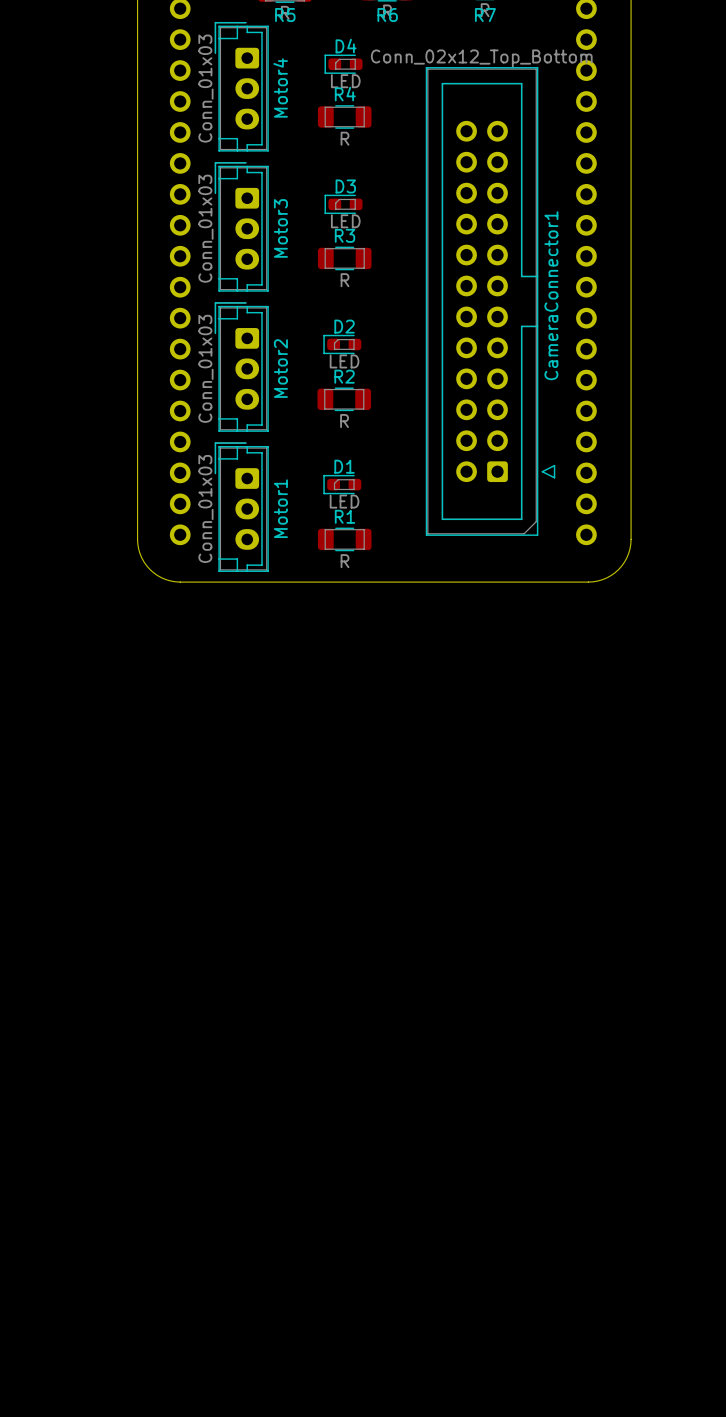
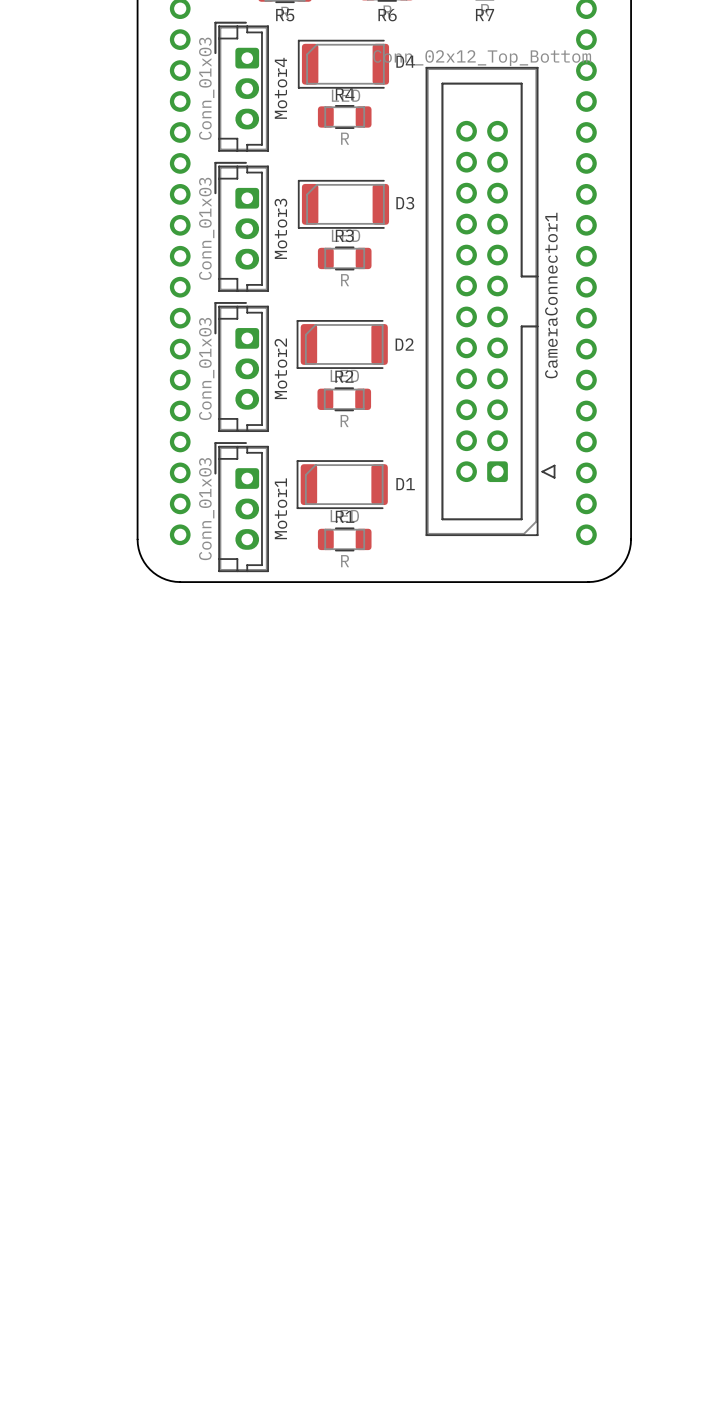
D4 name position: D4 (346, 46) -> D4 (405, 61)
D4 footprint: [324, 54, 363, 74] -> [298, 39, 390, 89]
D3 name position: D3 (345, 186) -> D3 (405, 203)
D3 footprint: [324, 194, 363, 215] -> [298, 180, 390, 229]
D2 name position: D2 (344, 326) -> D2 (404, 344)
D2 footprint: [323, 334, 362, 355] -> [296, 320, 388, 369]
D1 name position: D1 (344, 466) -> D1 (405, 484)
D1 footprint: [323, 474, 362, 495] -> [296, 460, 388, 509]

